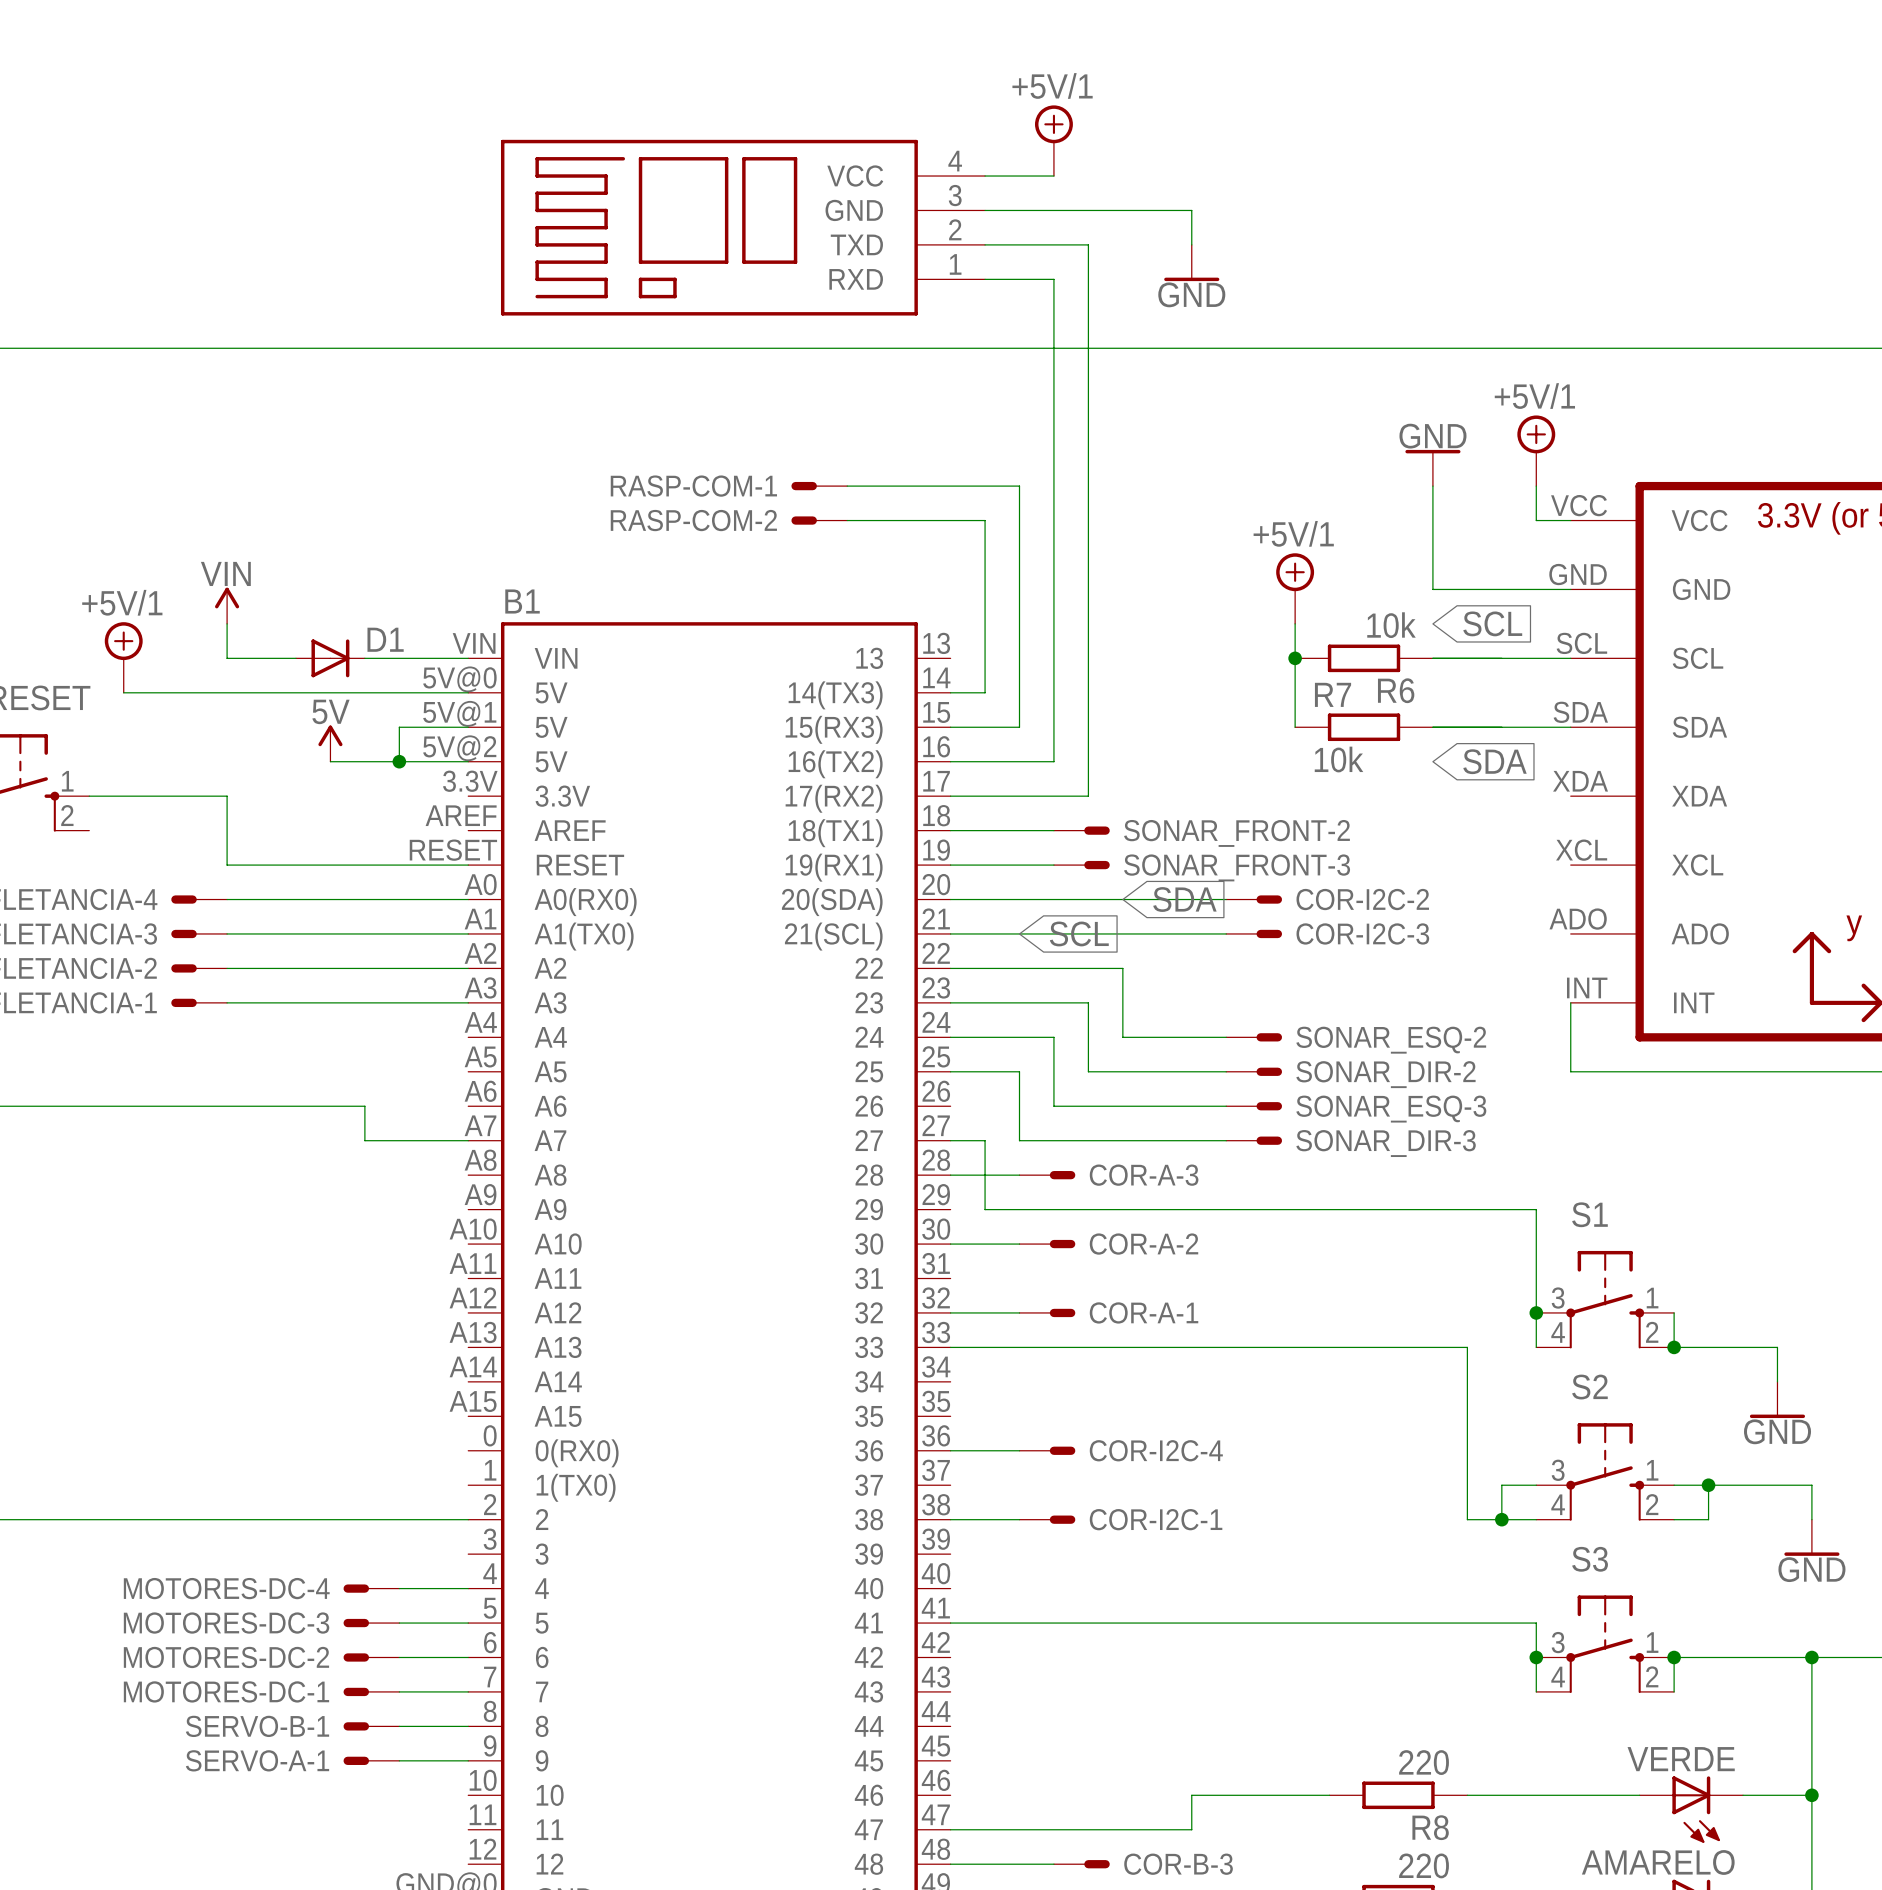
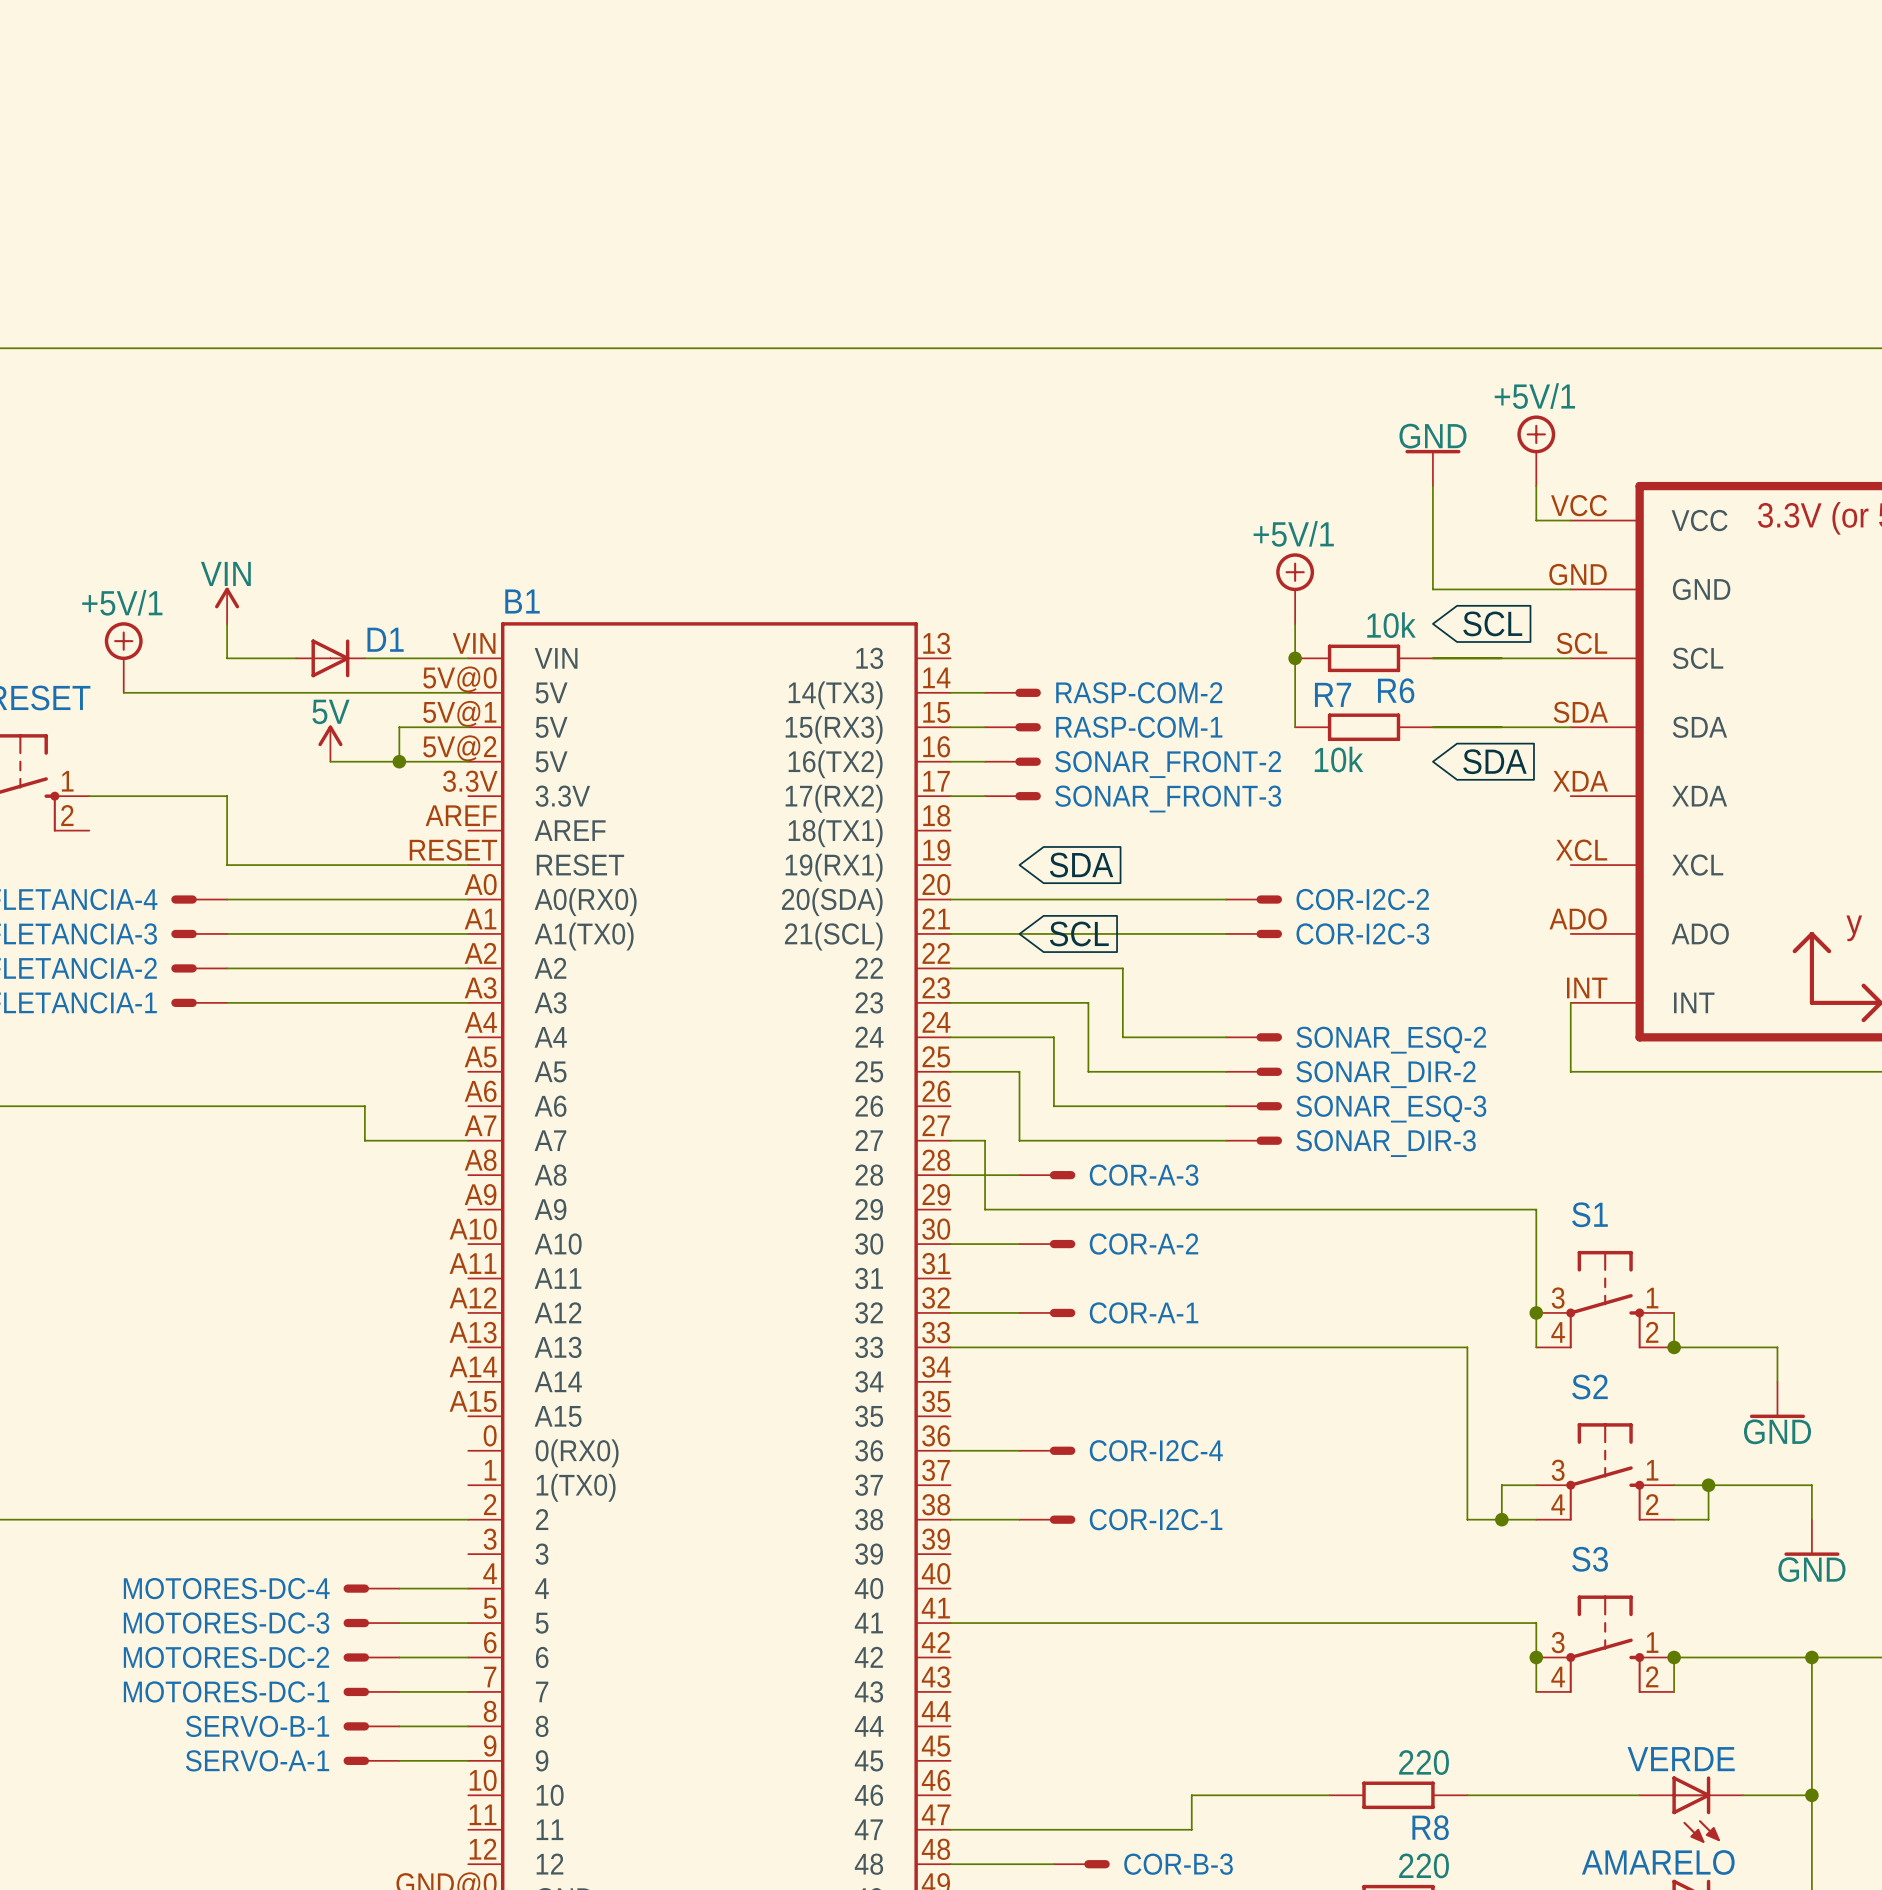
power symbol: +5V/1 (1053, 140) -> none
wire: (985, 176) (1053, 176) -> none
wire: (985, 210) (1191, 210) (1191, 244) -> none
part: (743, 227) -> none
wire: (985, 244) (1088, 244) (1088, 796) (985, 796) -> none
power symbol: GND (1191, 263) -> none
wire: (985, 279) (1053, 279) (1053, 761) (985, 761) -> none
RASP-COM-1 rotation: 0° (804, 486) -> 180° (1028, 727)
RASP-COM-1 position: (819, 486) -> (1012, 727)
wire: (847, 486) (1019, 486) (1019, 727) (985, 727) -> none
RASP-COM-2 rotation: 0° (804, 520) -> 180° (1028, 692)
RASP-COM-2 position: (819, 520) -> (1012, 692)
wire: (847, 520) (985, 520) (985, 692) -> none
wire: (950, 830) (1053, 830) -> none
SONAR_FRONT-2 position: (1081, 830) -> (1012, 761)
wire: (950, 865) (1053, 865) -> none
SONAR_FRONT-3 position: (1081, 865) -> (1012, 796)
global label position: SDA (1184, 899) -> SDA (1081, 865)

